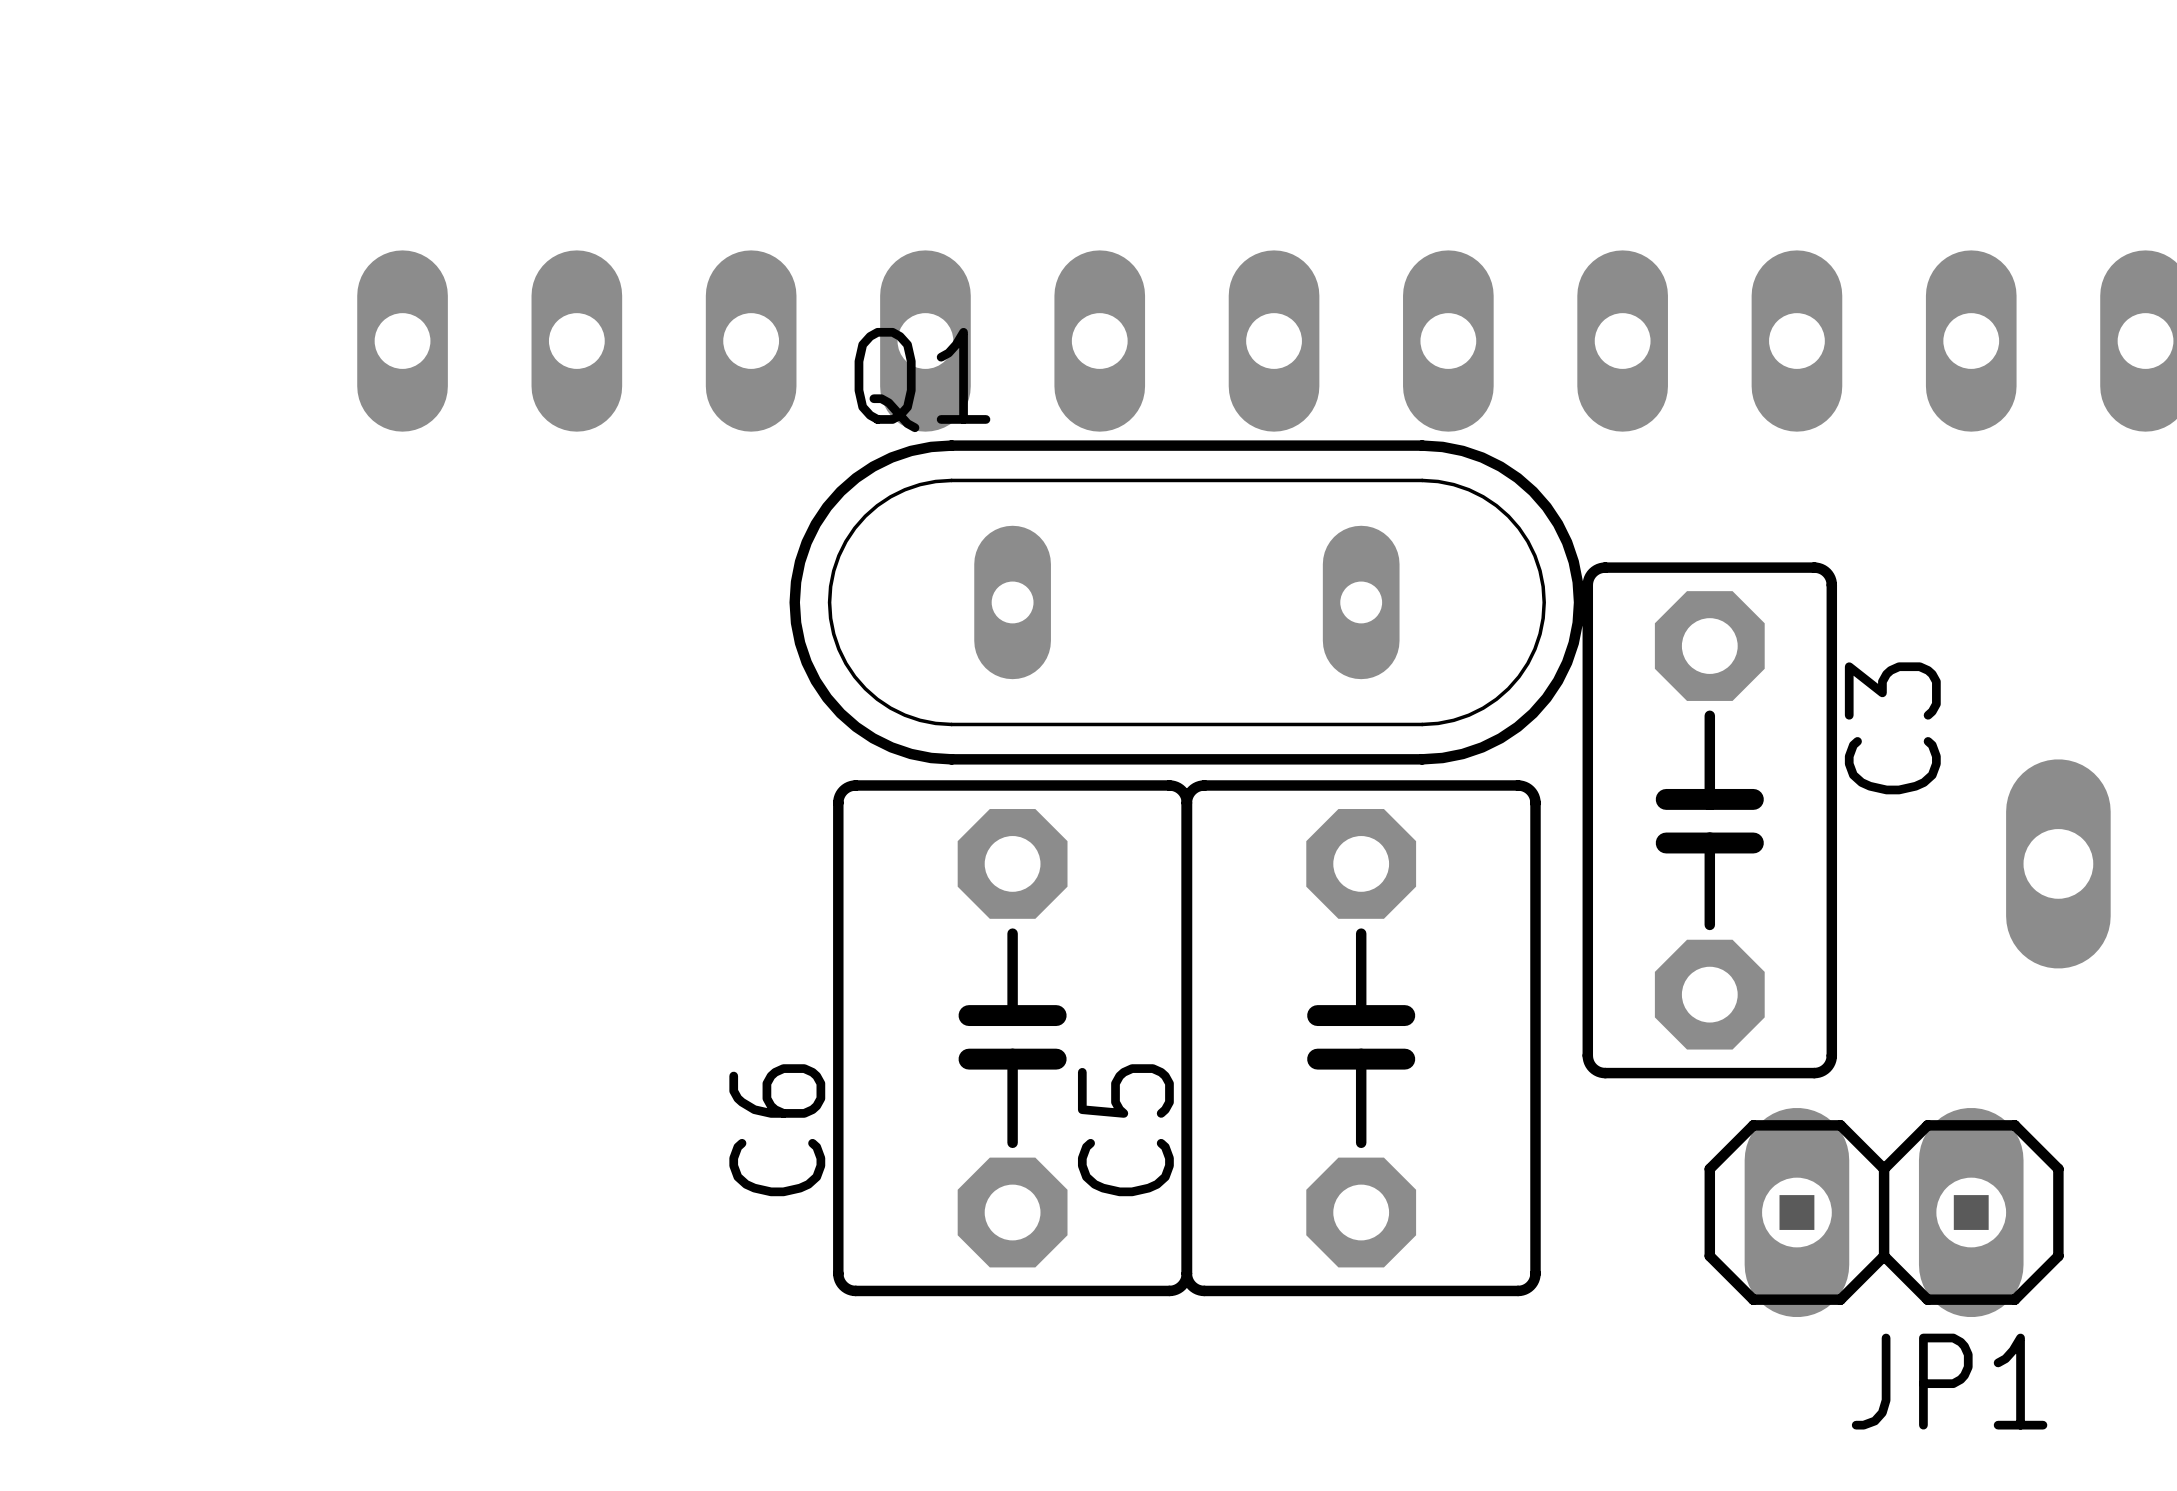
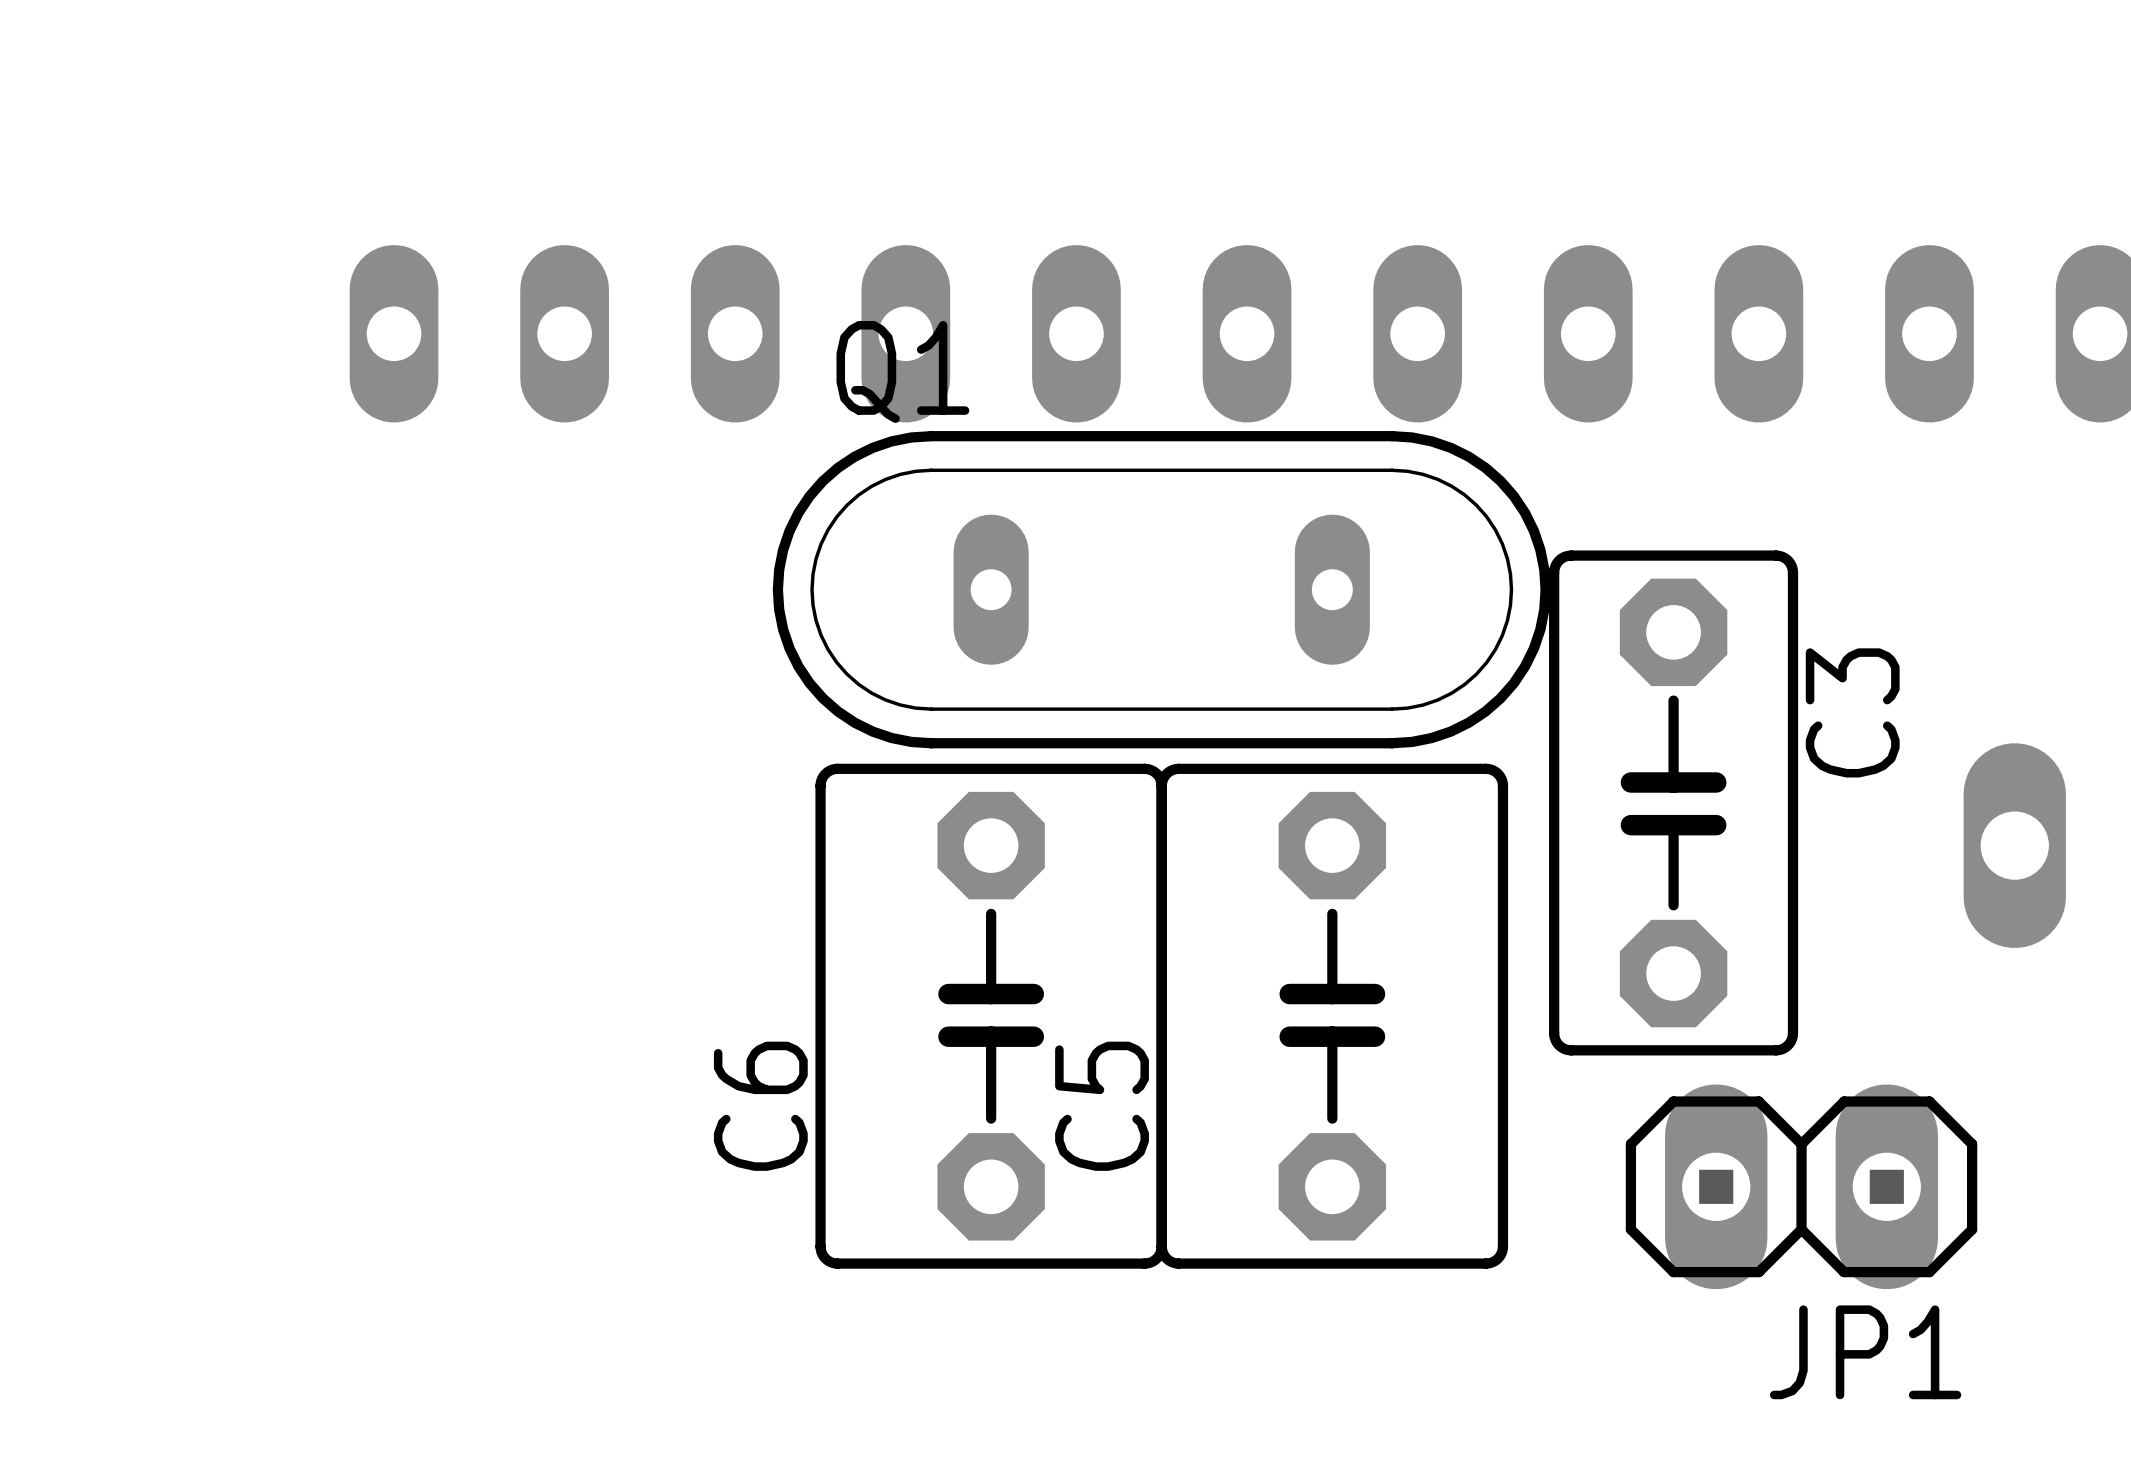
JP1 position: (1884, 1212) -> (1801, 1186)

